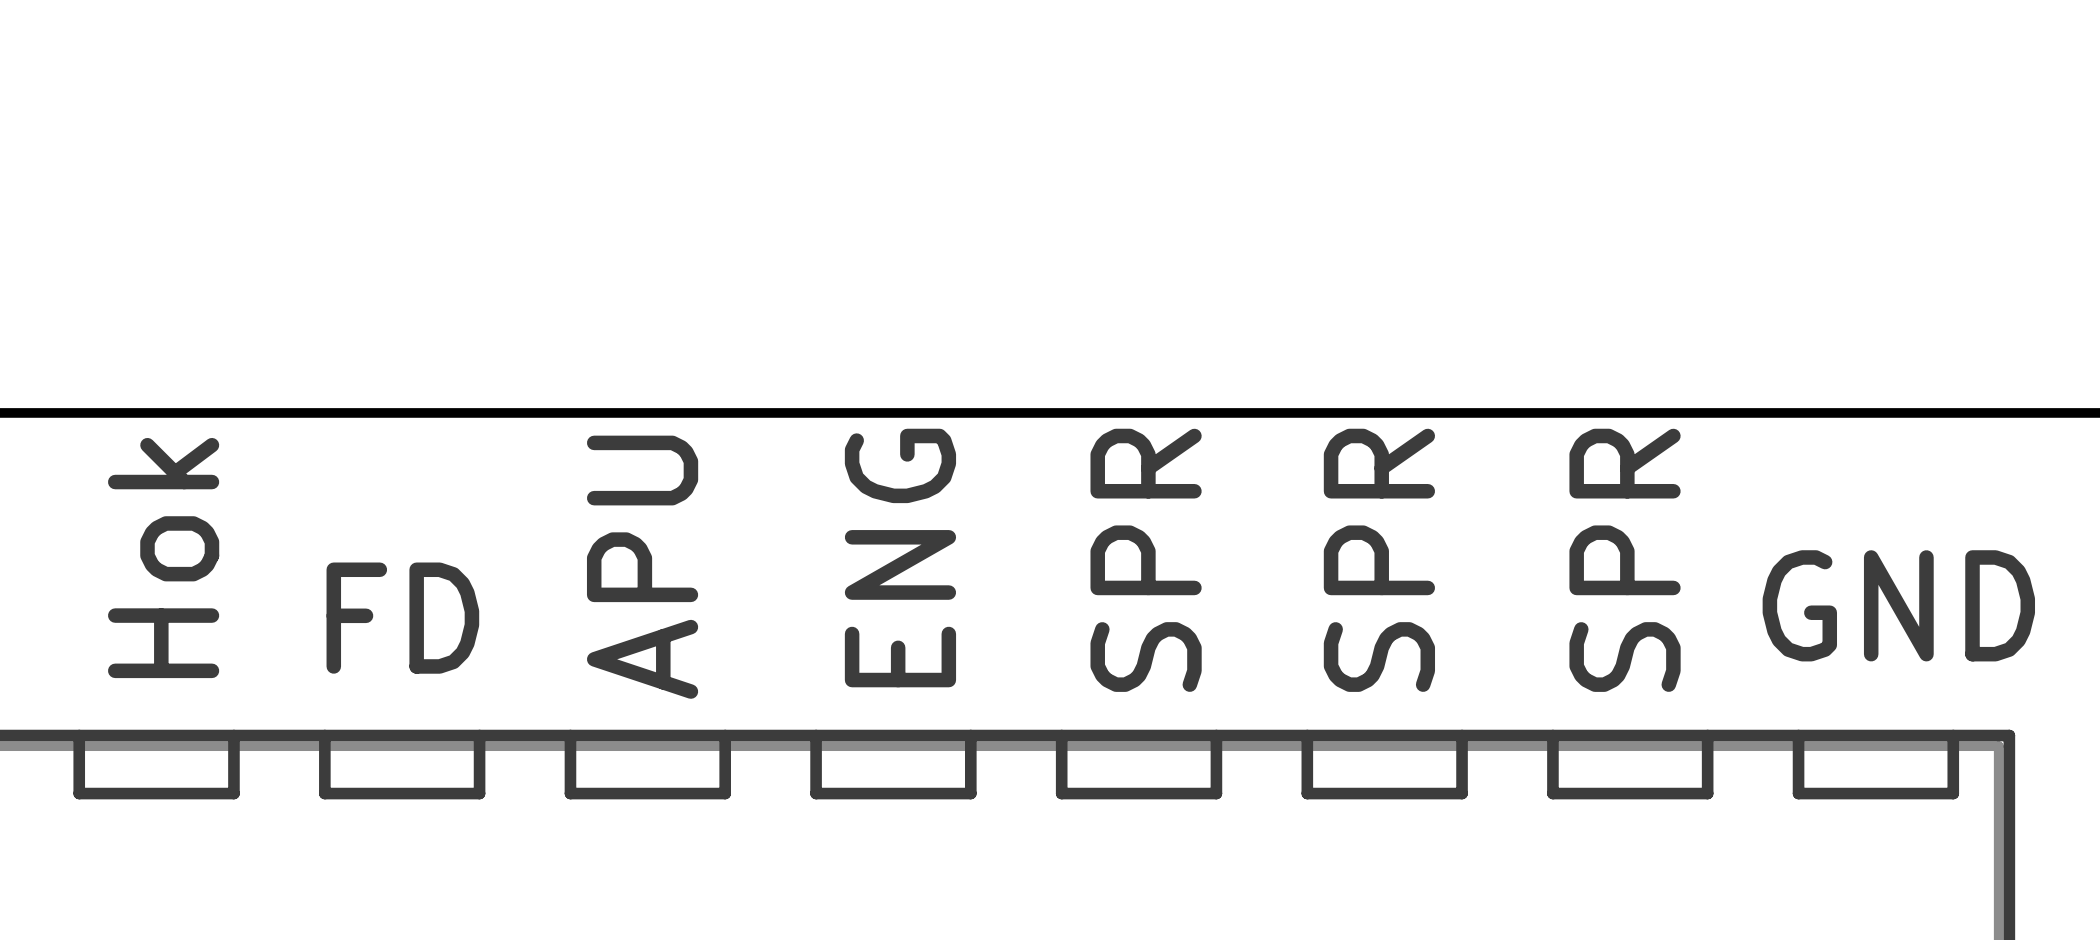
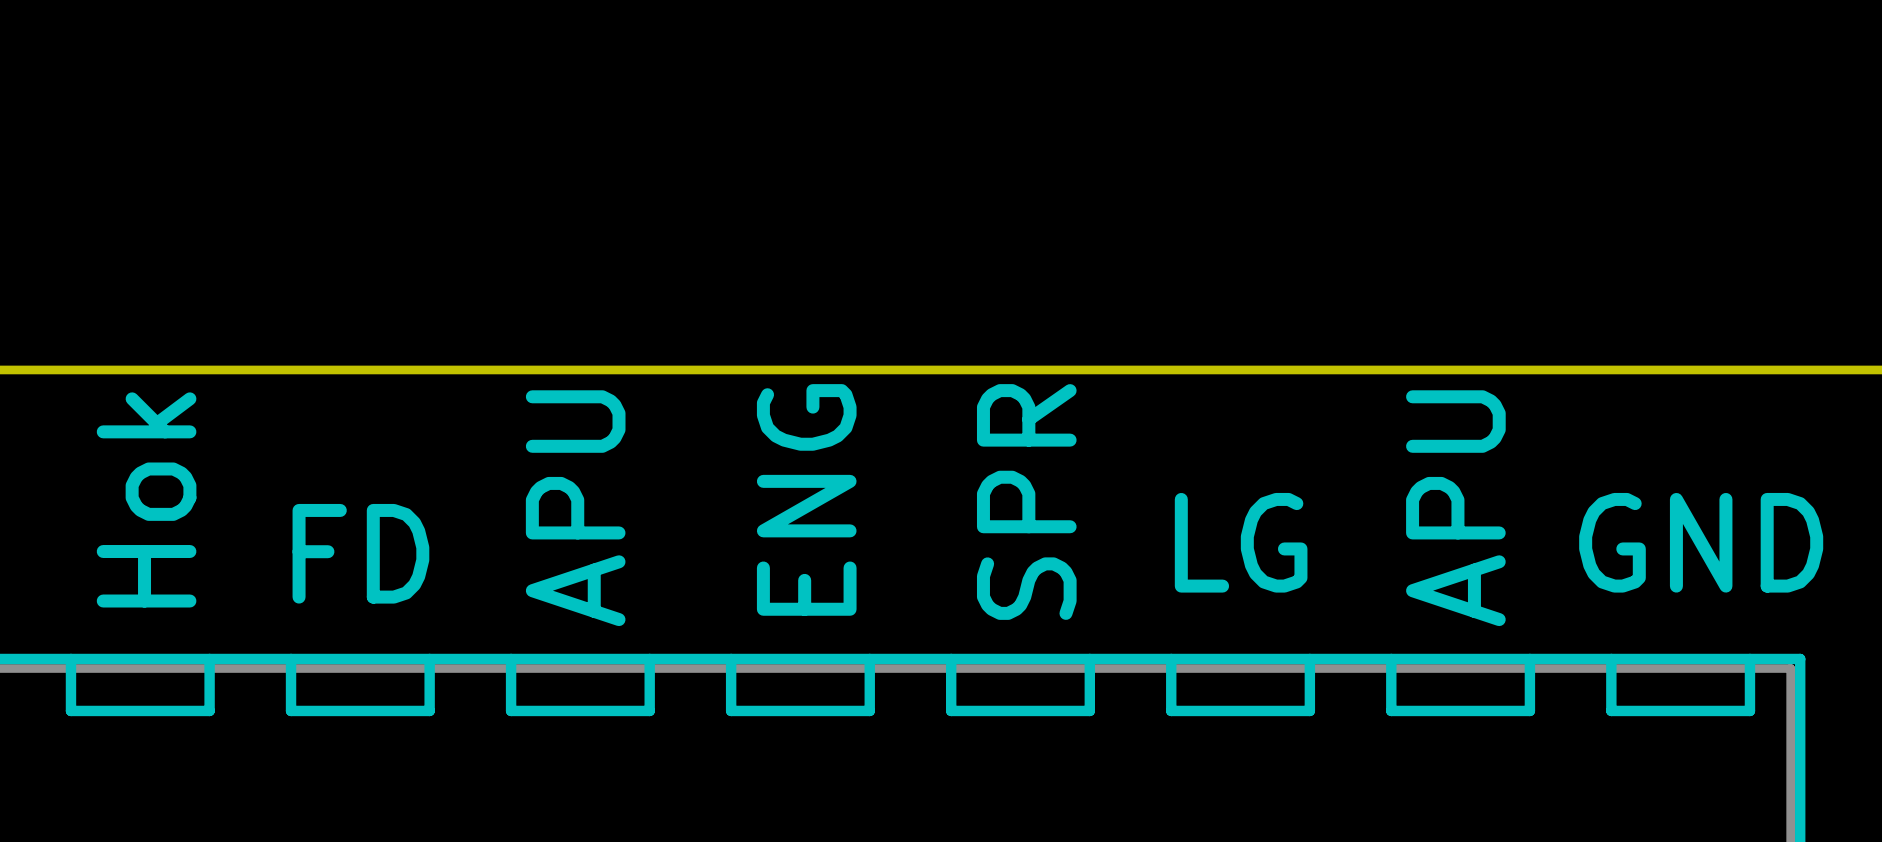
text: SPR (1379, 560) -> LG (1241, 542)
text: SPR (1625, 560) -> APU (1455, 508)

